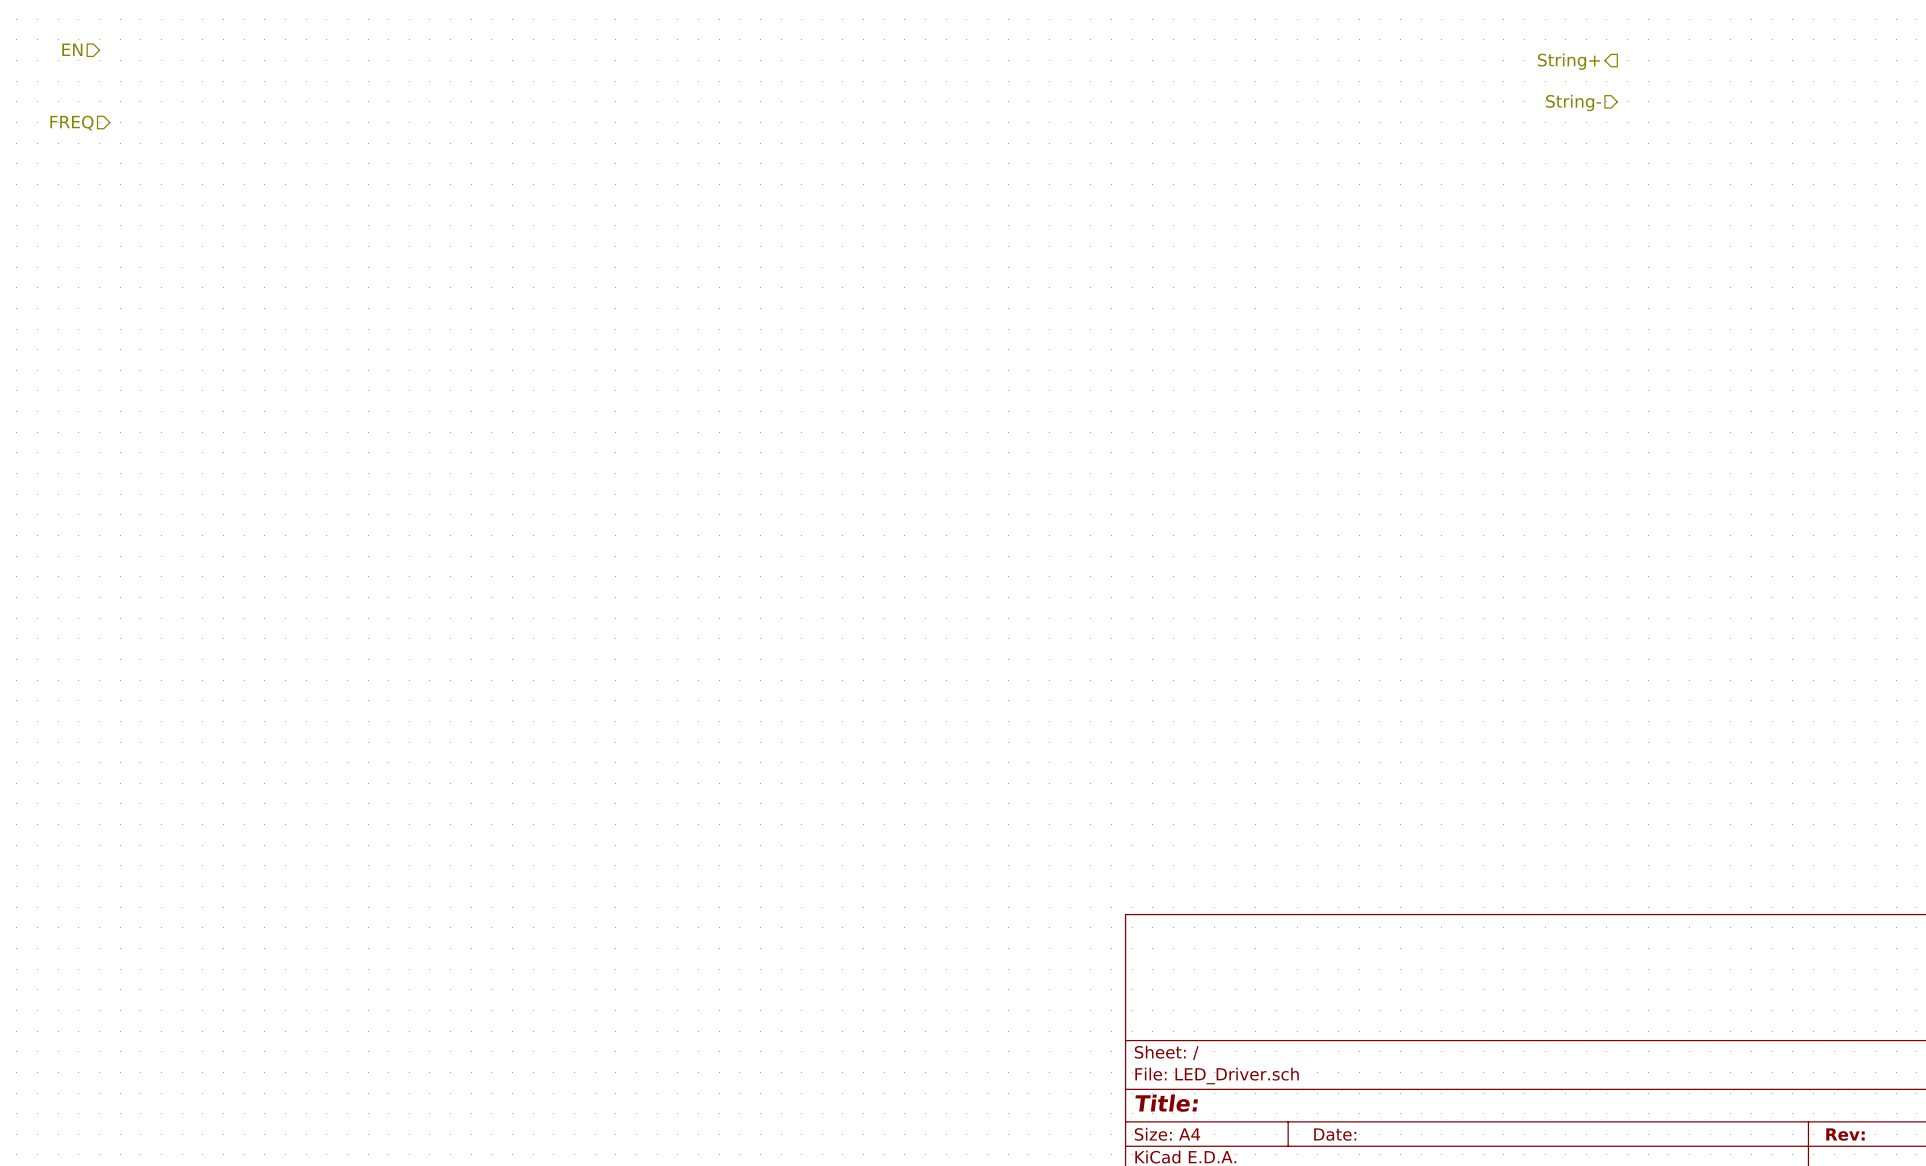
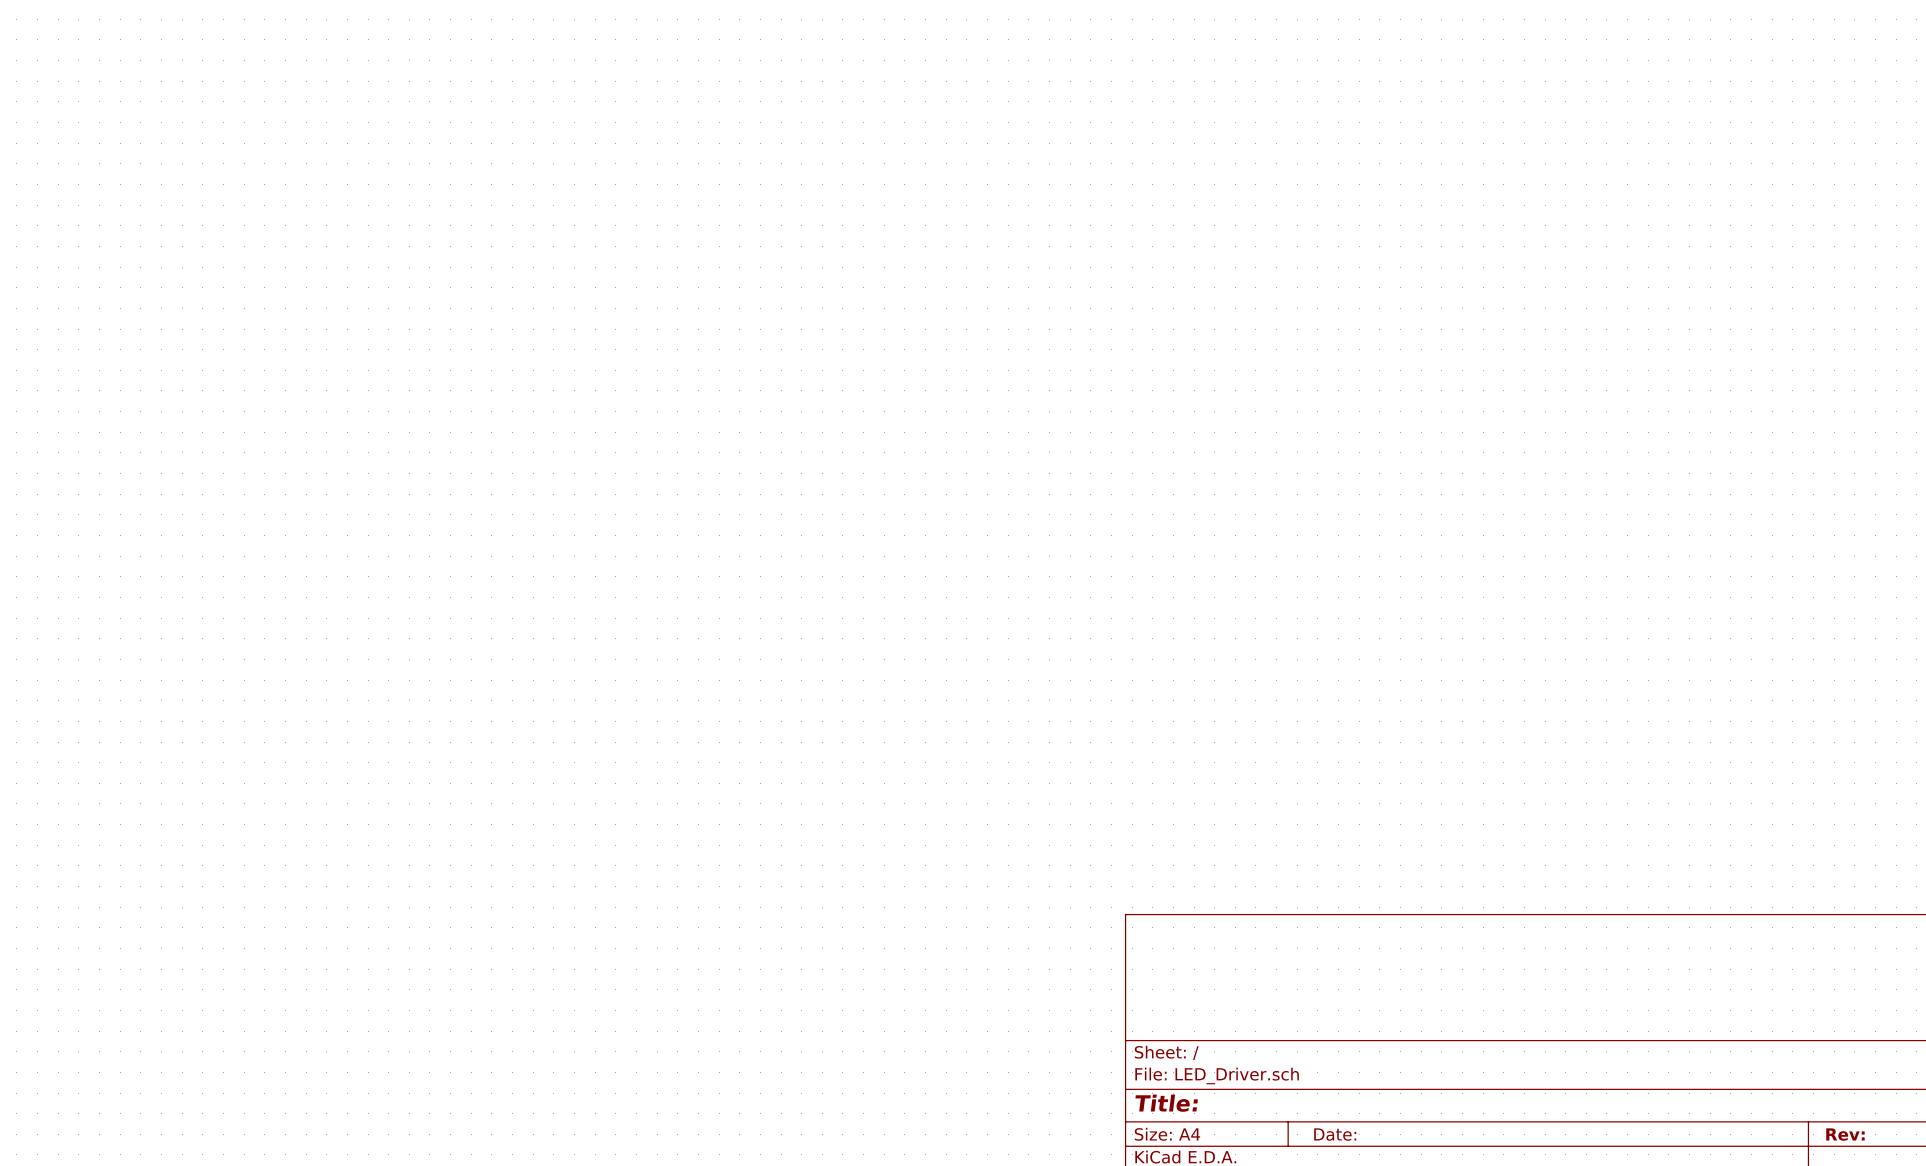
hierarchical label: EN (72, 49) -> none
hierarchical label: String+ (1569, 61) -> none
hierarchical label: String- (1573, 102) -> none
hierarchical label: FREQ (71, 123) -> none

